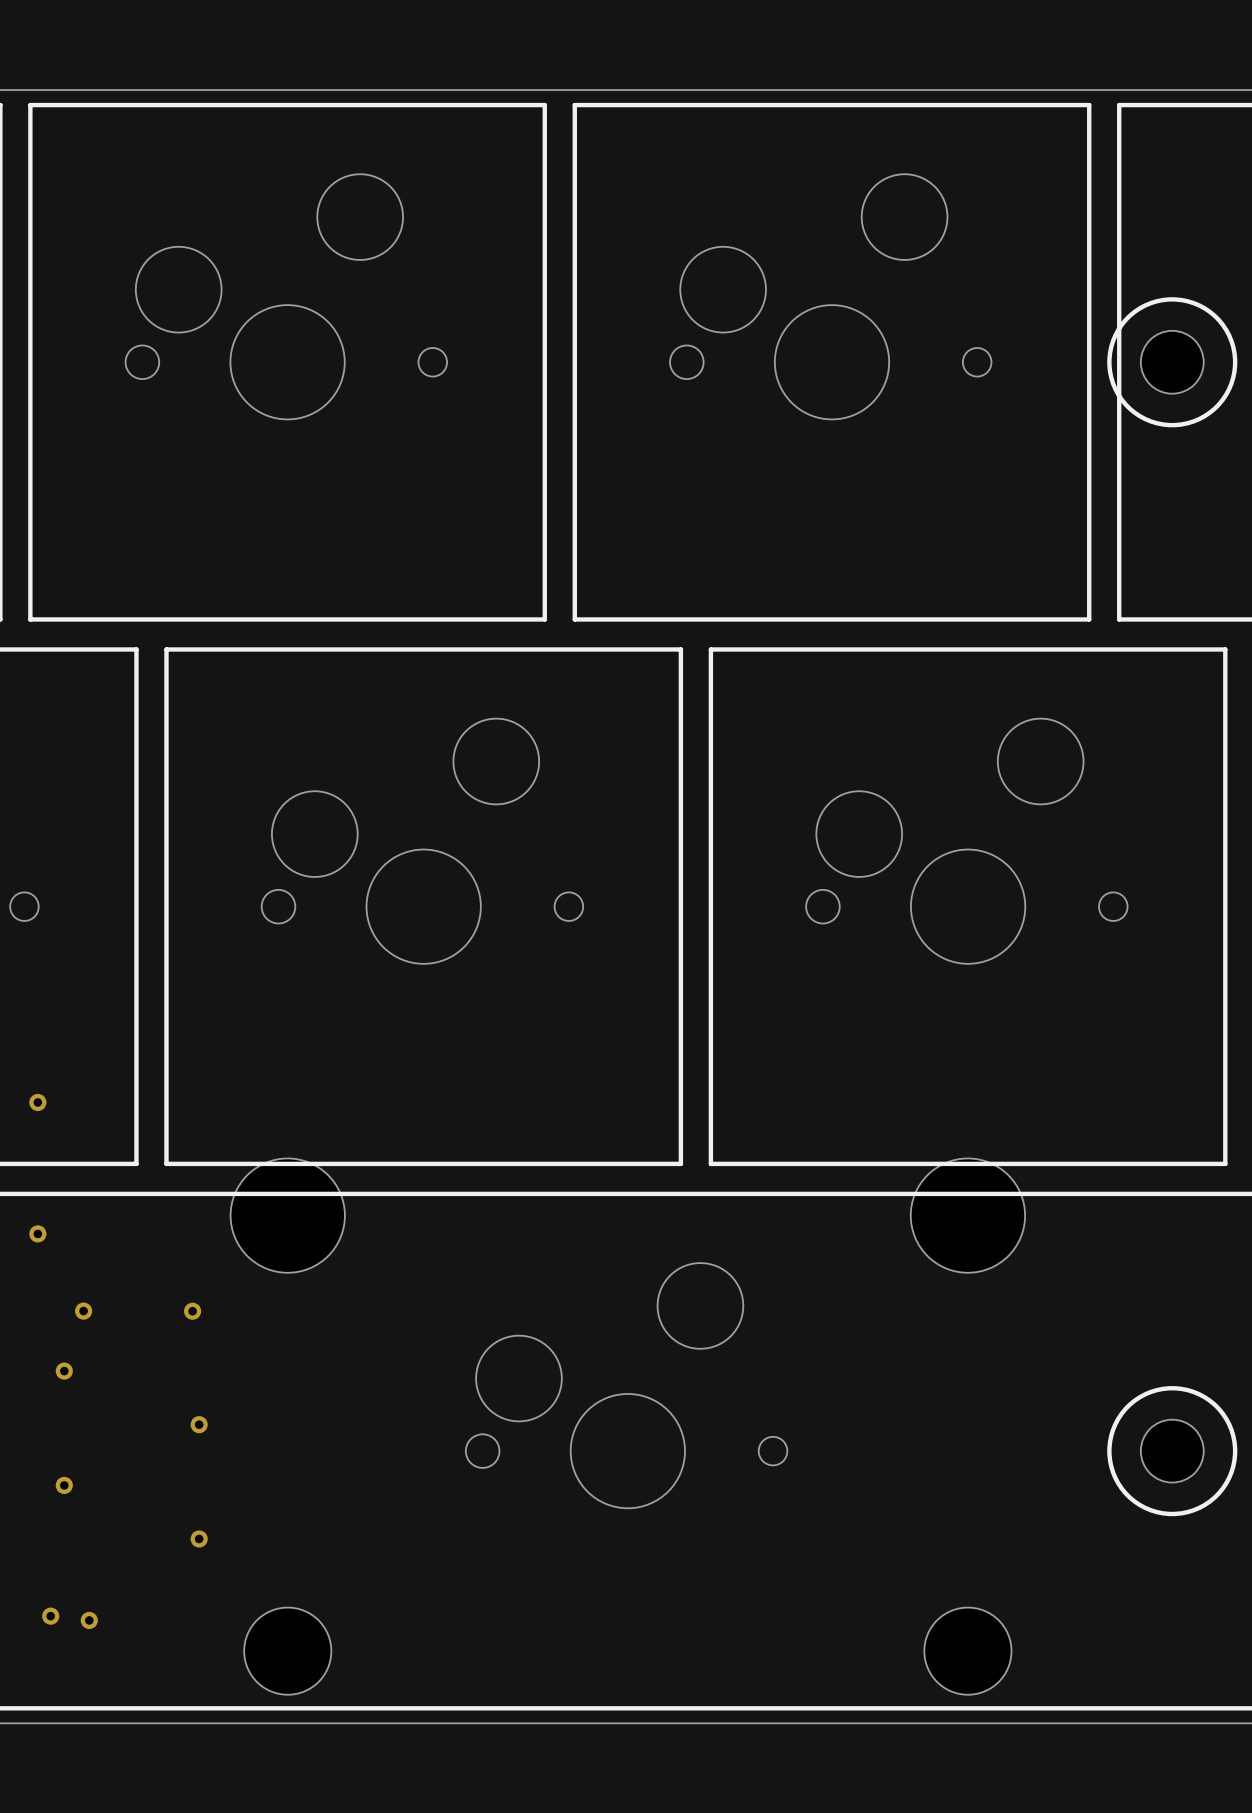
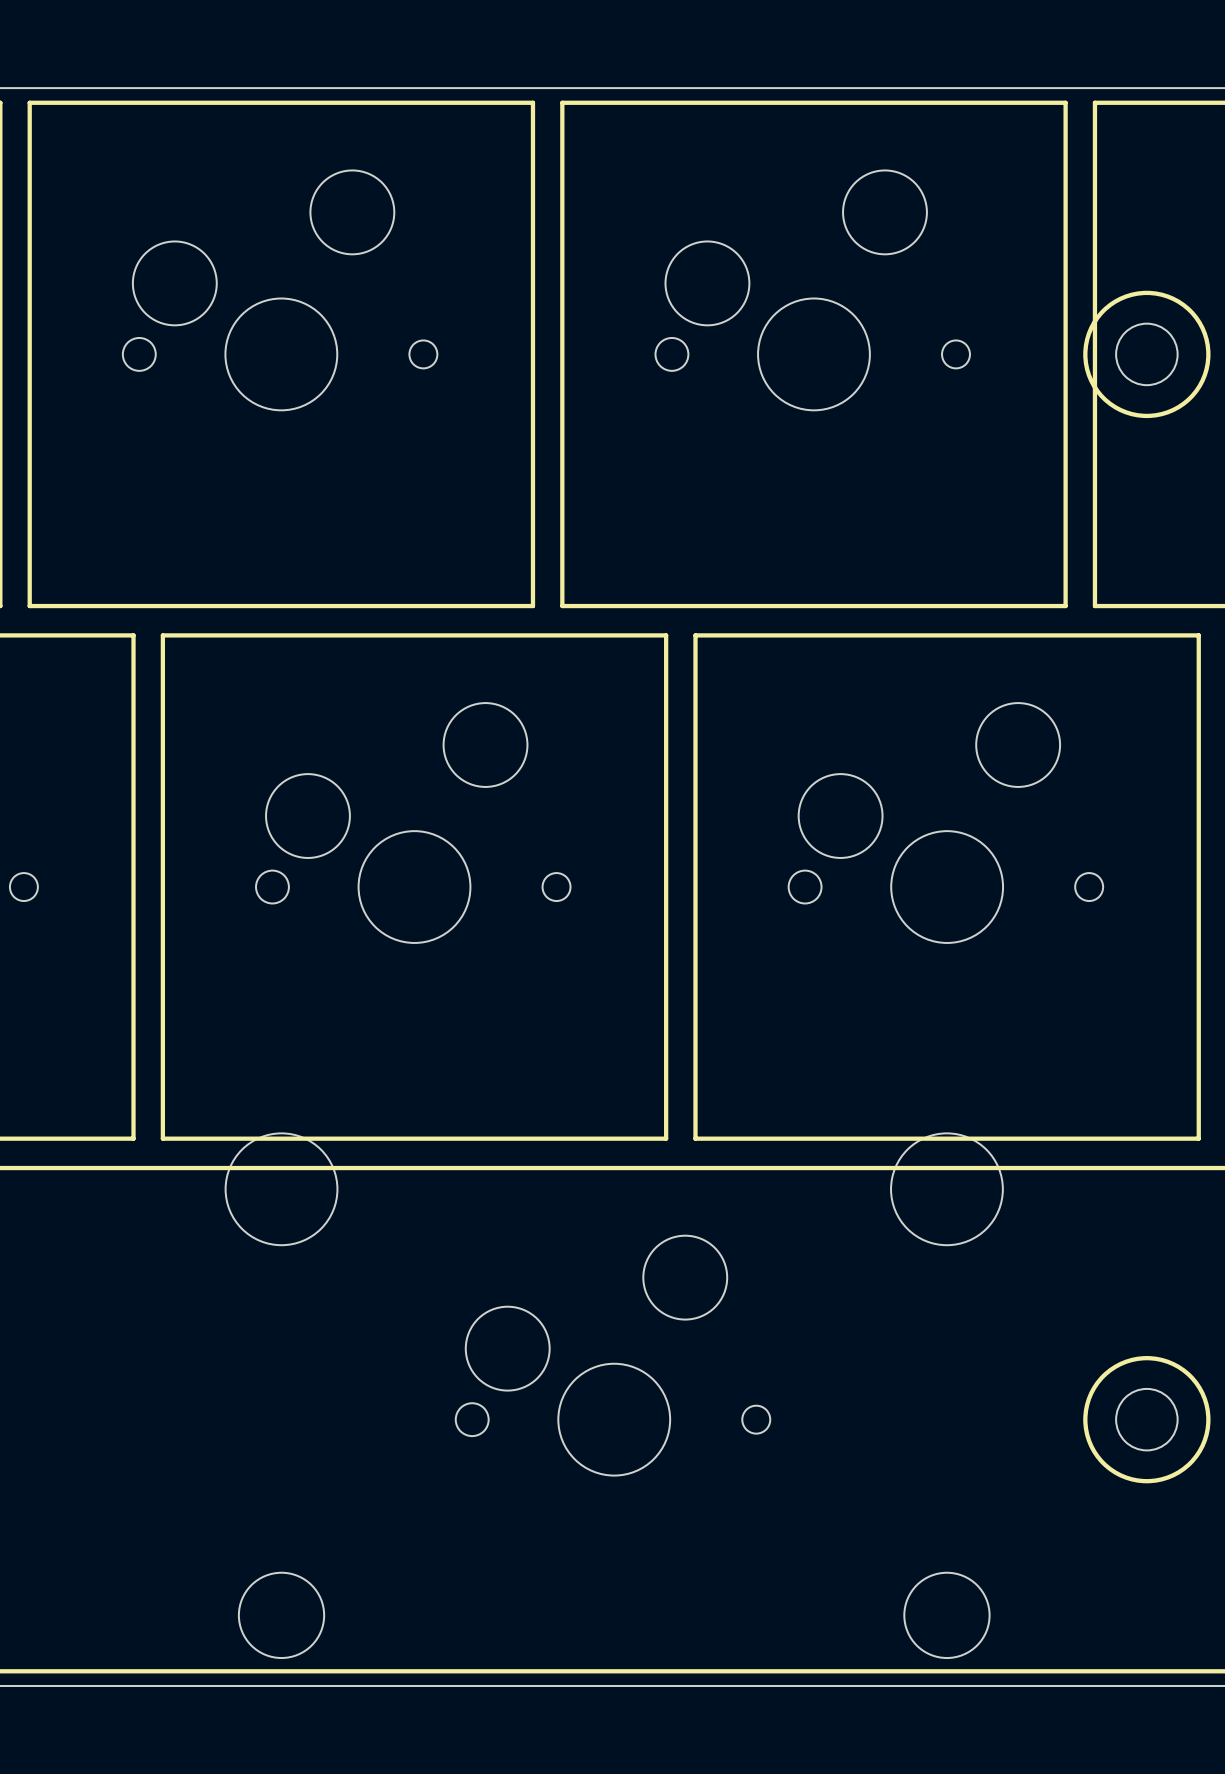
via: (37, 1102) -> none
via: (37, 1233) -> none
via: (83, 1311) -> none
via: (192, 1311) -> none
via: (64, 1371) -> none
via: (199, 1424) -> none
via: (64, 1485) -> none
via: (199, 1538) -> none
via: (50, 1616) -> none
via: (89, 1620) -> none

